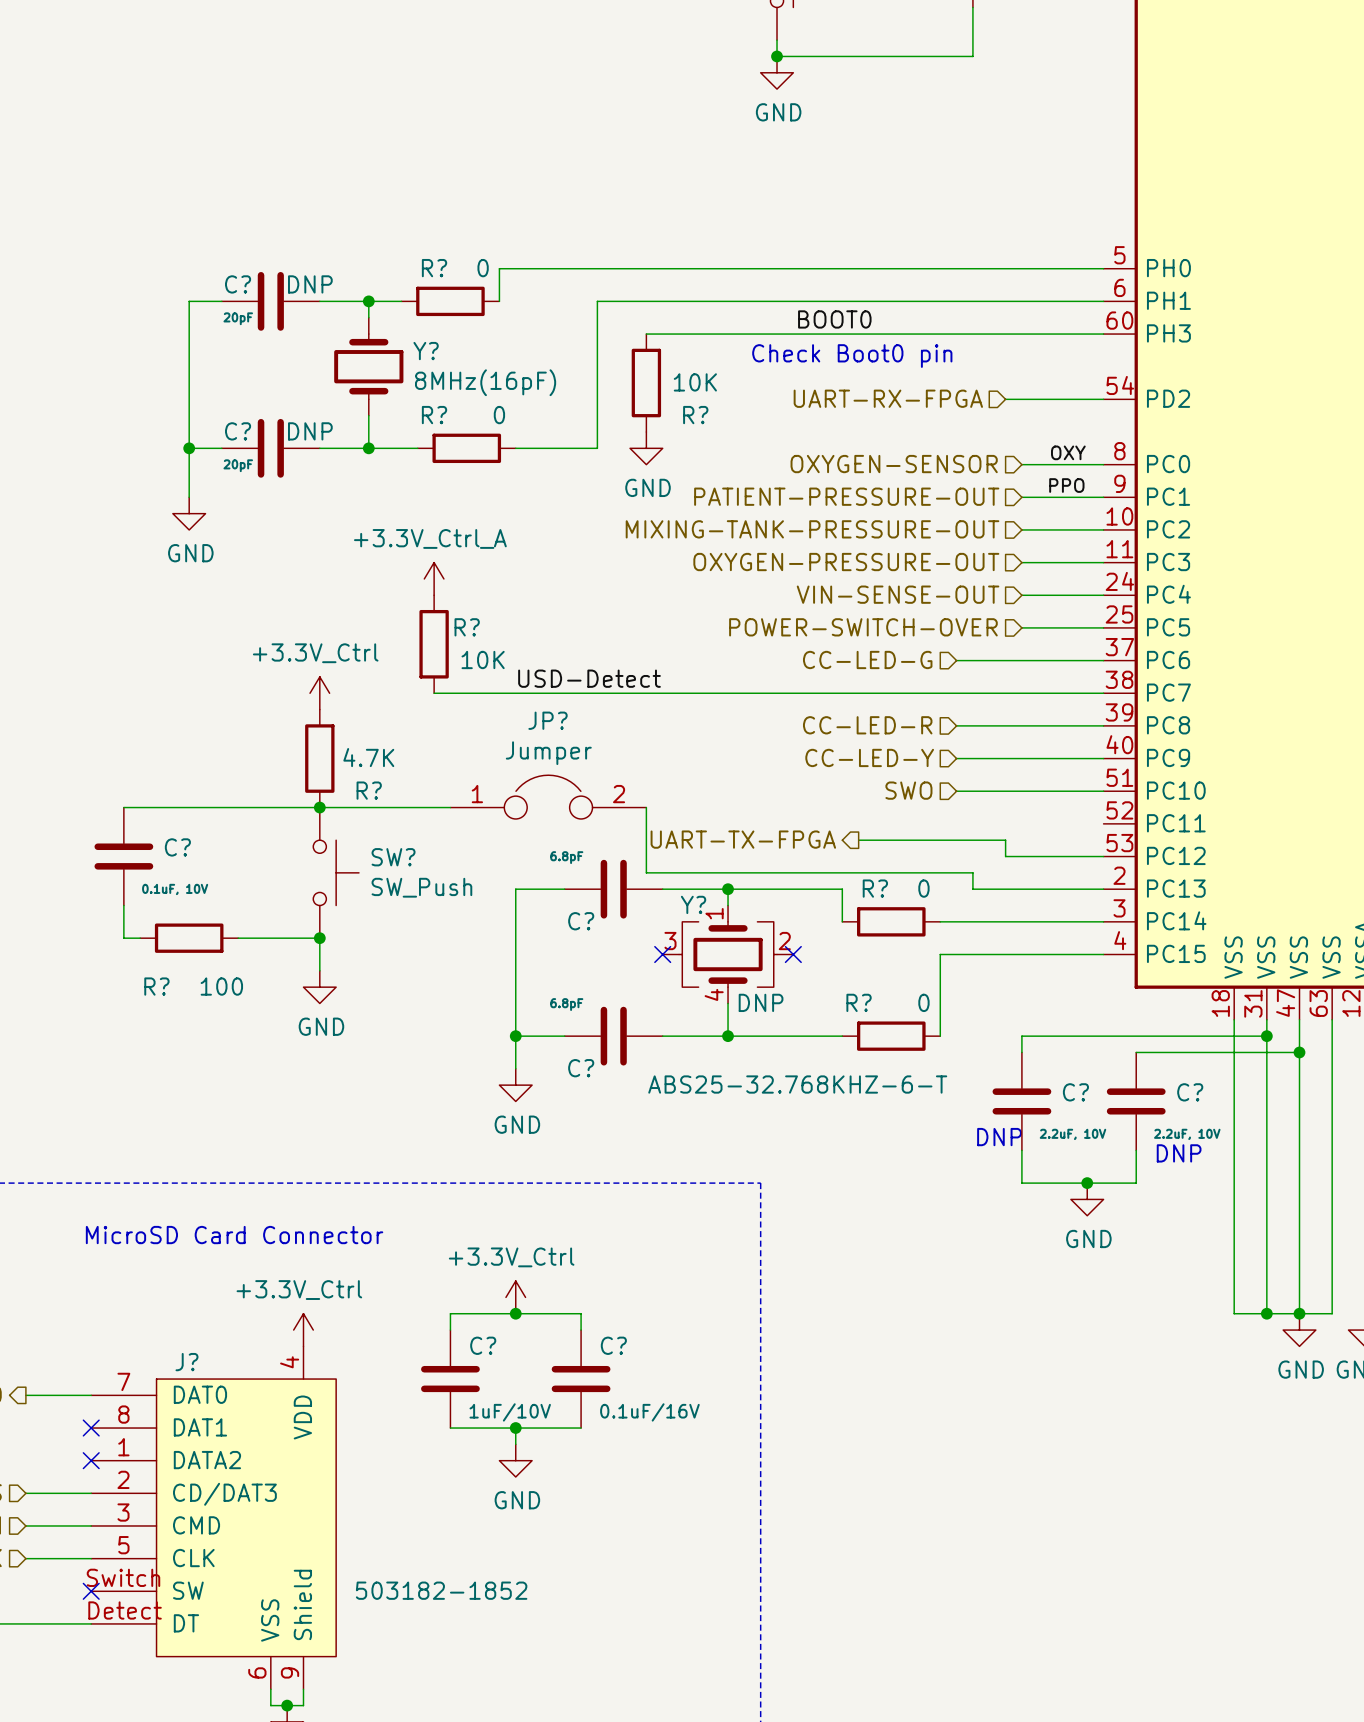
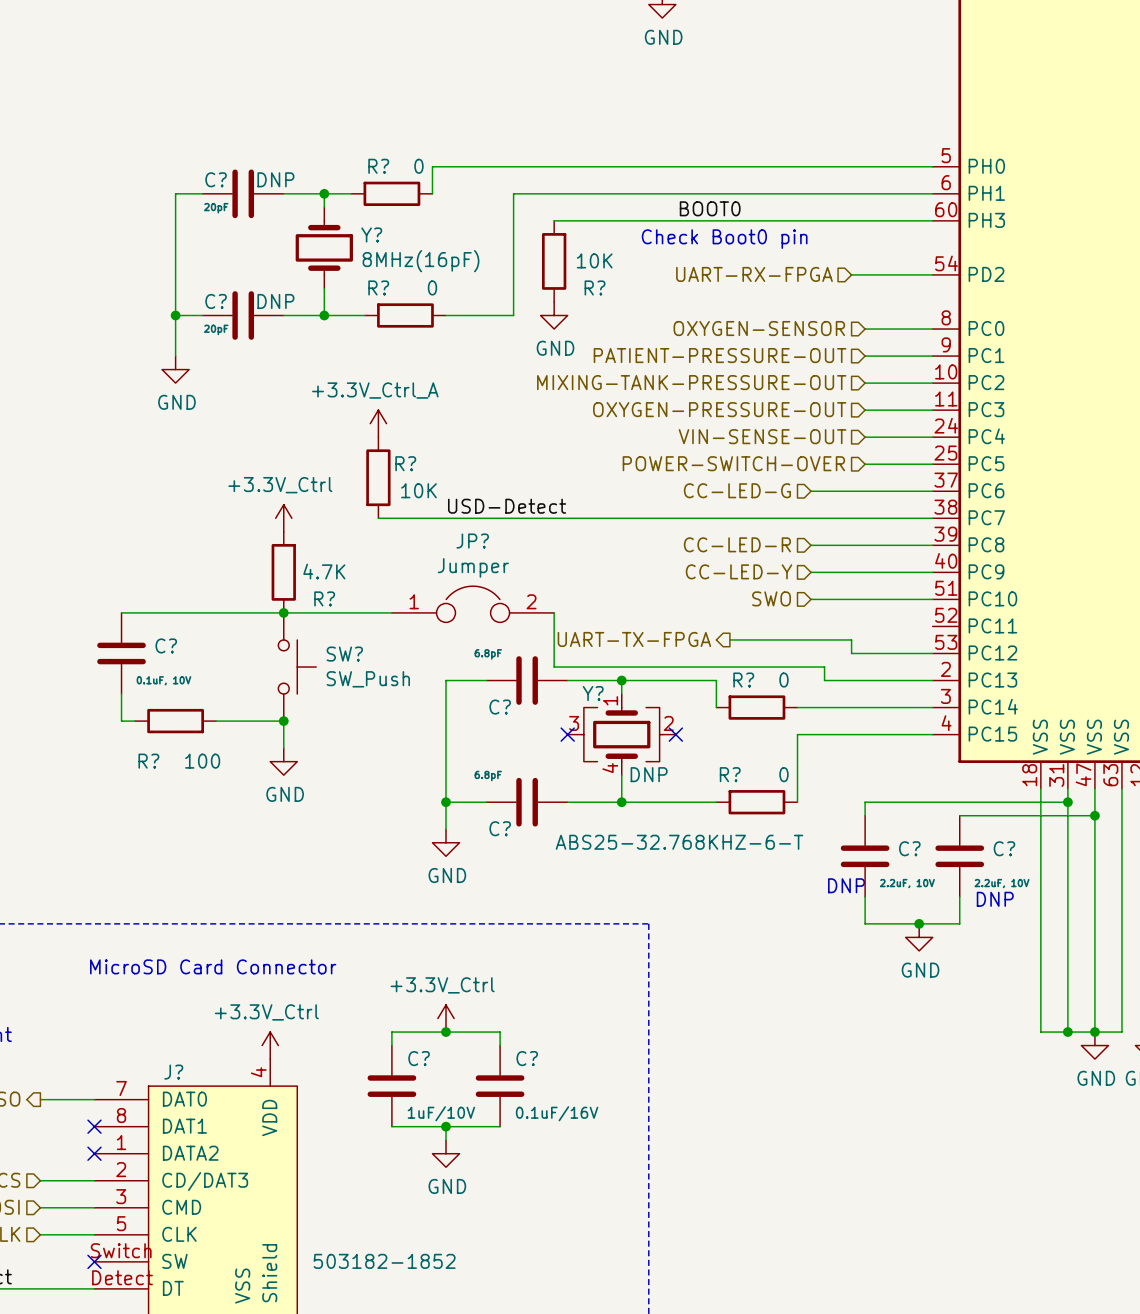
label: OXY (1068, 452) -> none
label: PPO (1066, 485) -> none

